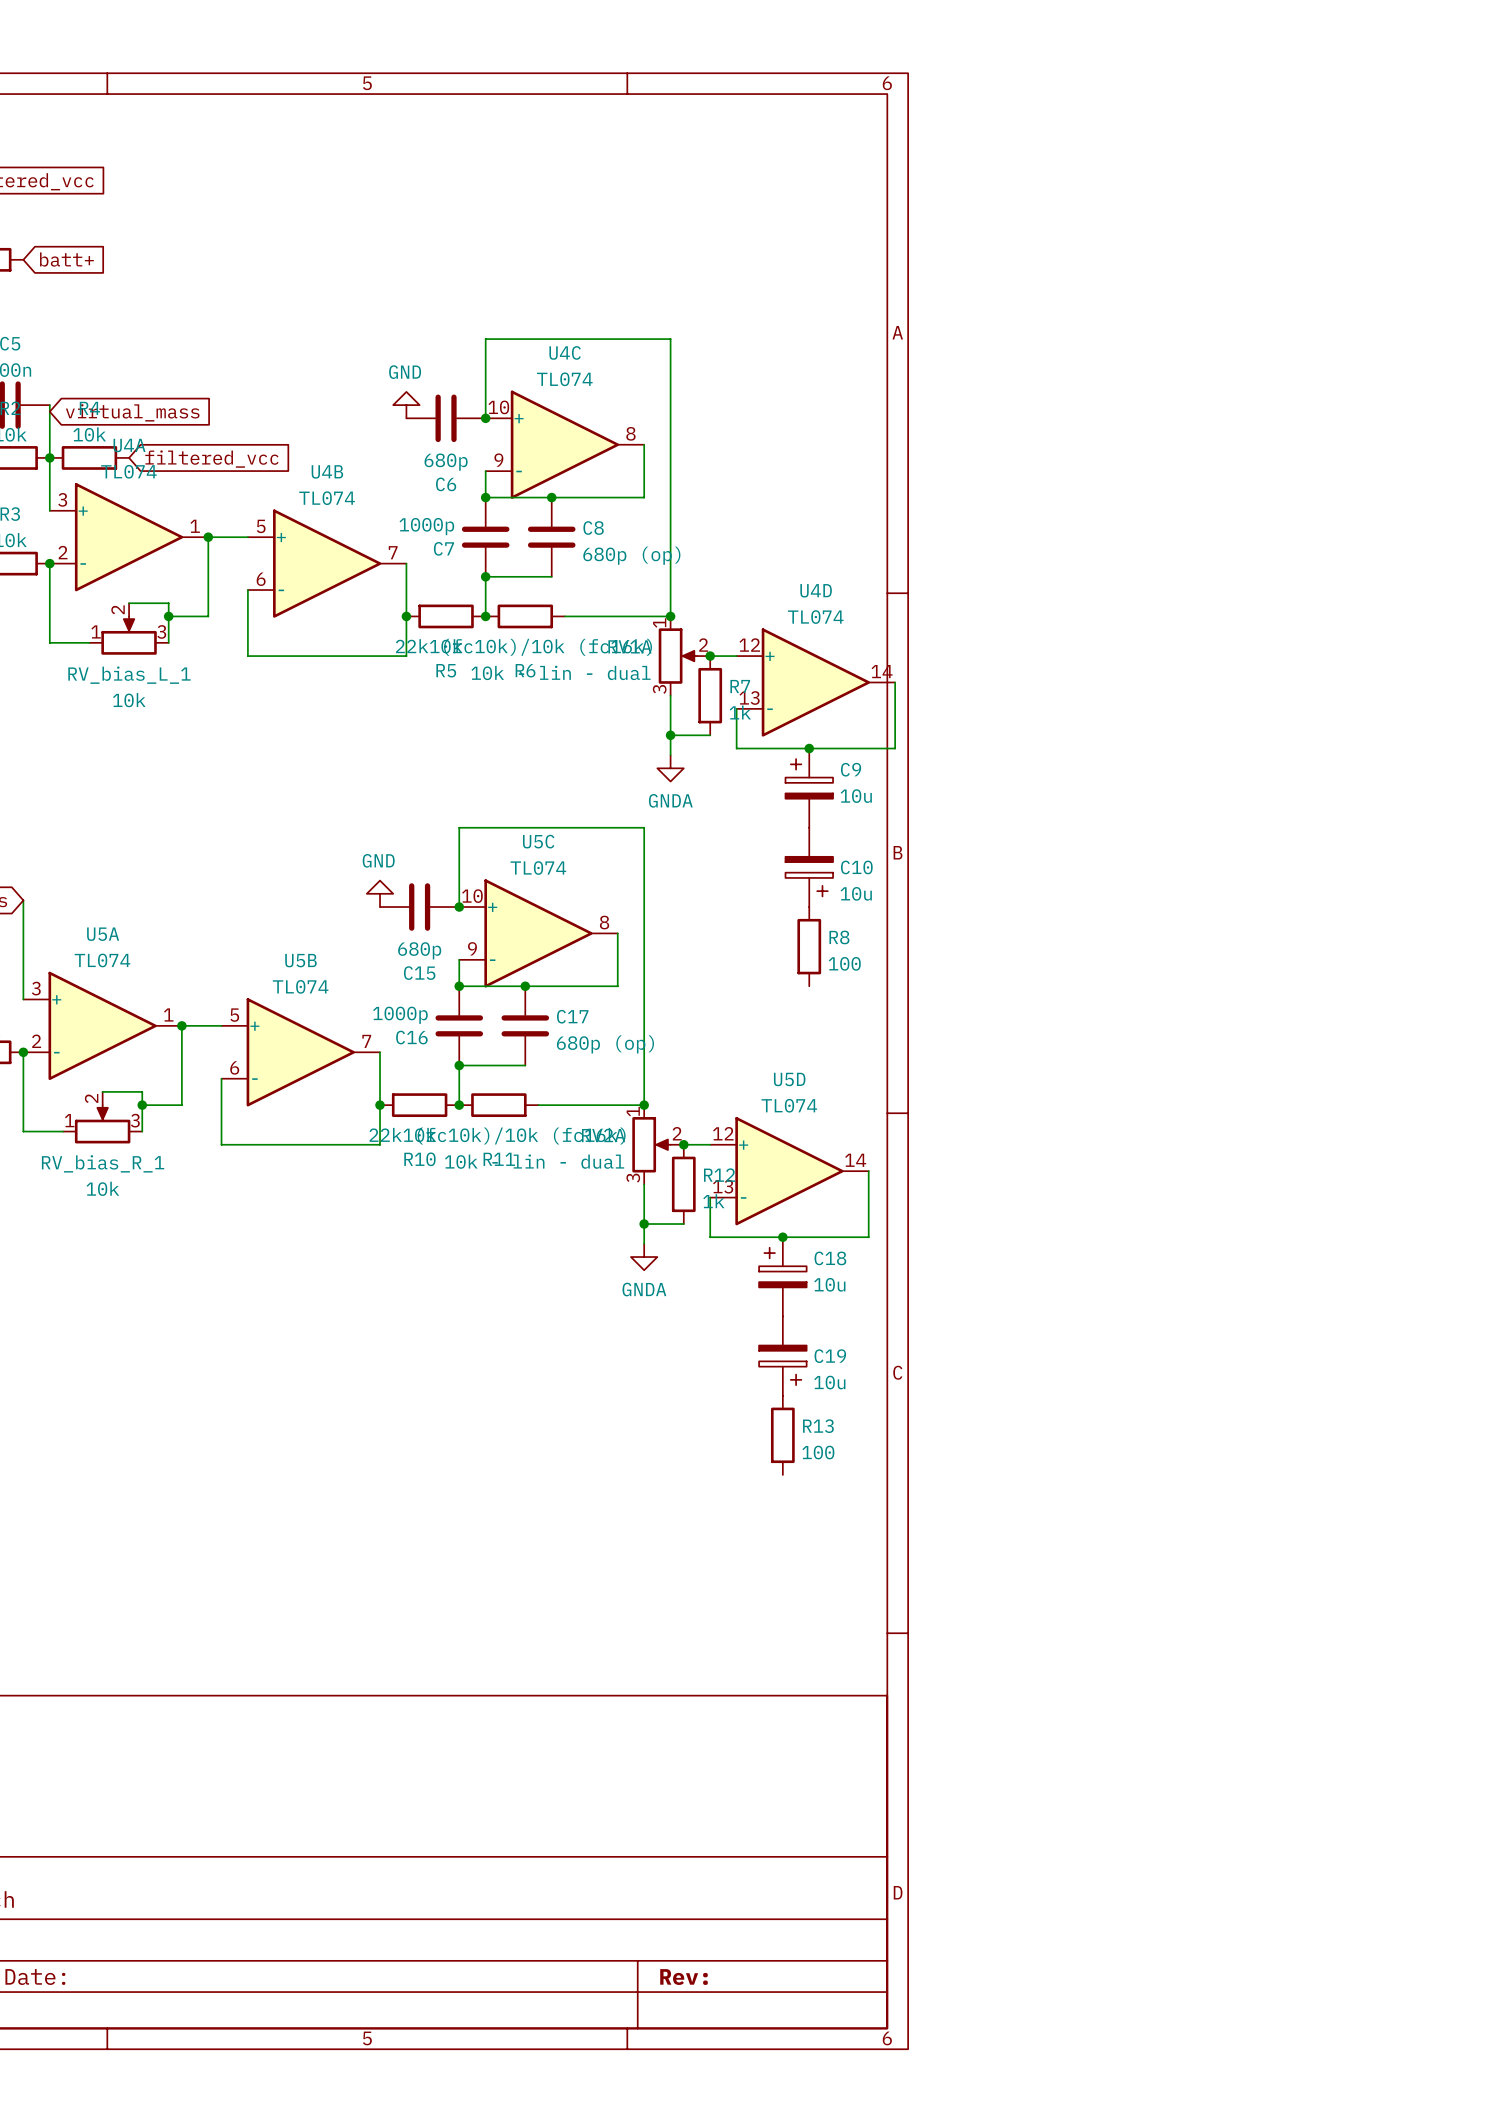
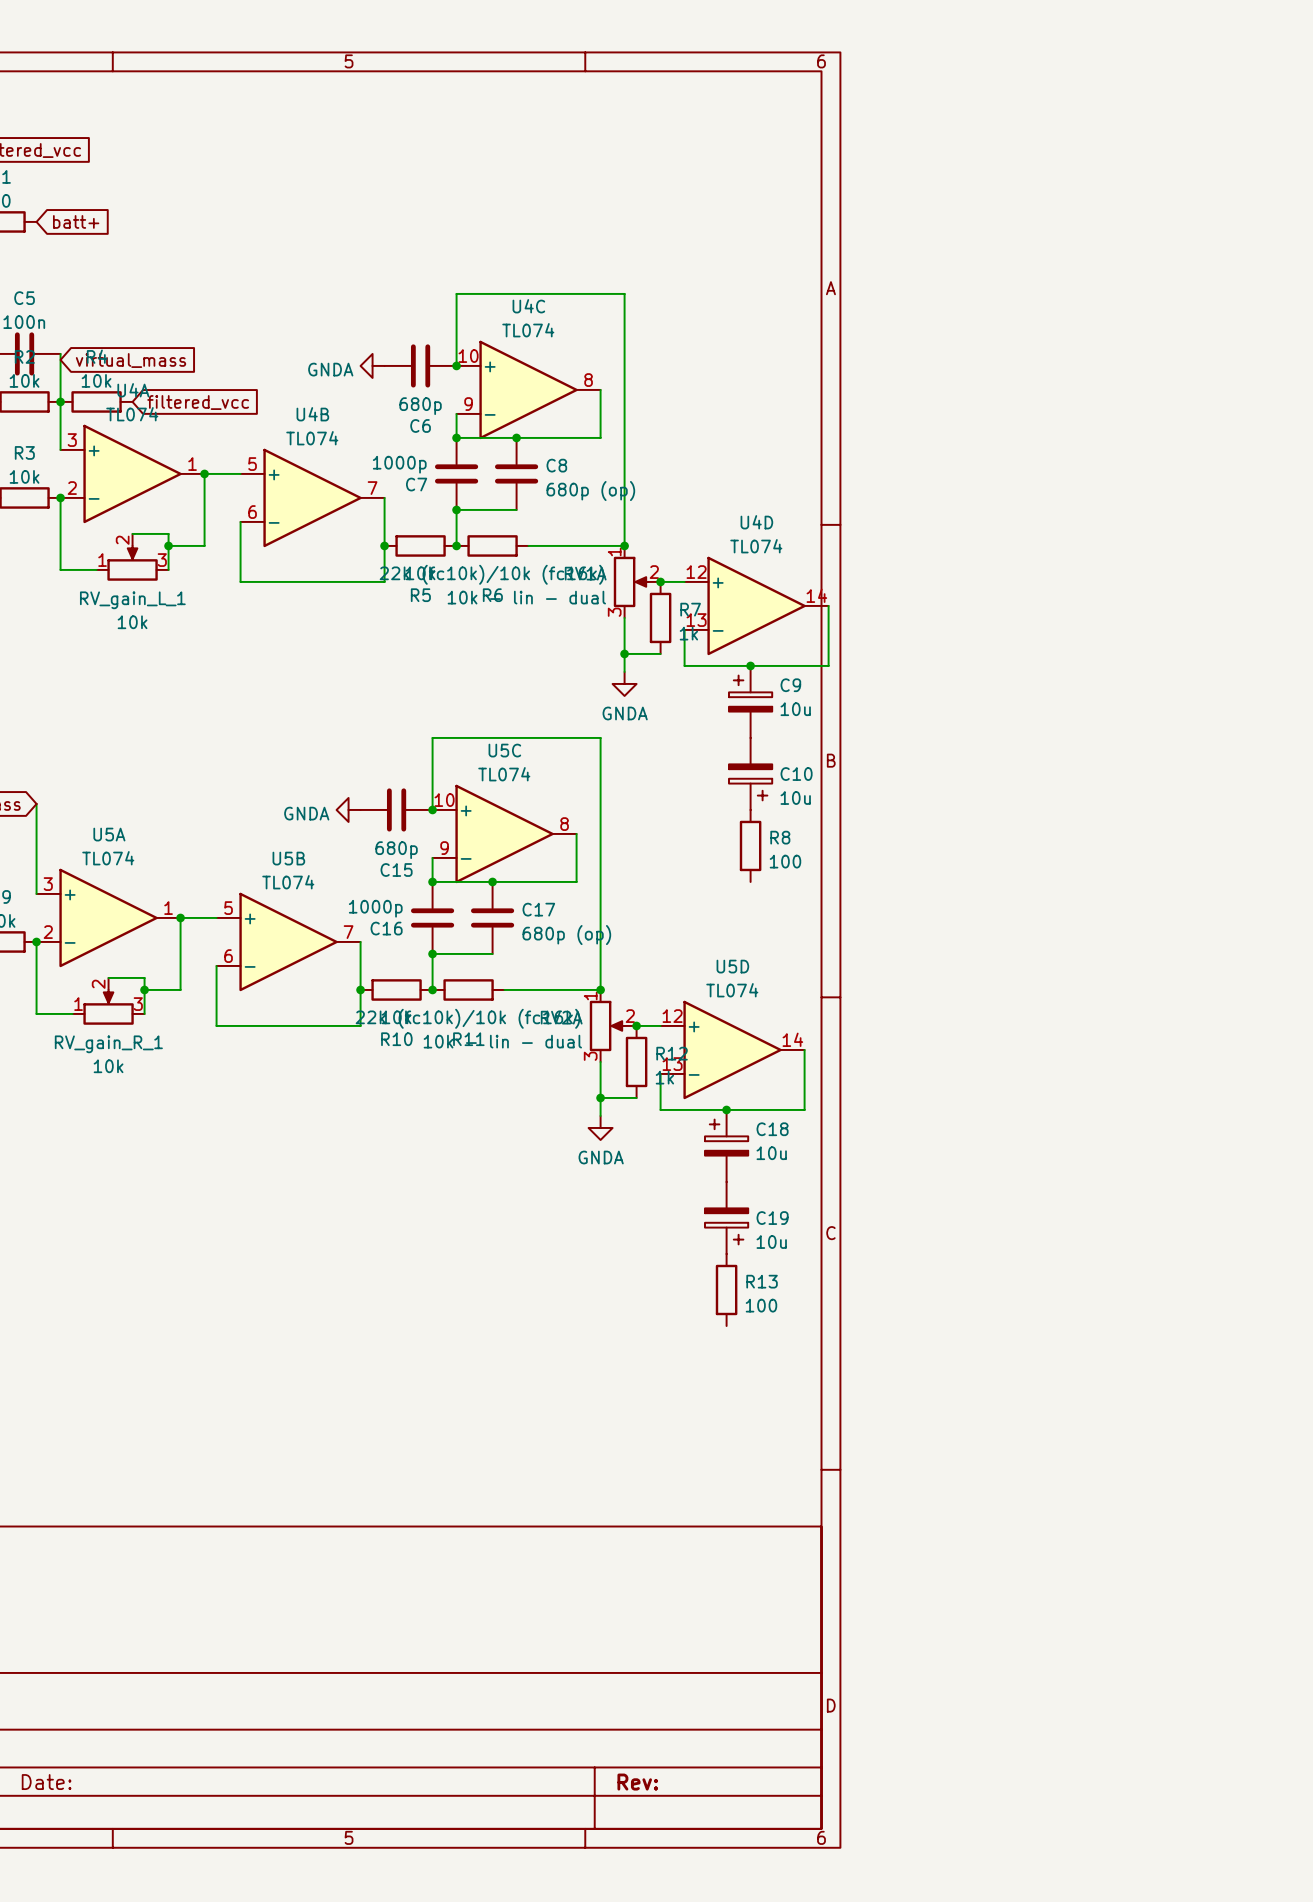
power symbol: GND (406, 405) -> none
power symbol: none -> GNDA (372, 365)
RV_bias_L_1 name: RV_bias_L_1 (129, 675) -> RV_gain_L_1 (132, 600)
power symbol: GND (380, 893) -> none
power symbol: none -> GNDA (348, 809)
RV_bias_R_1 name: RV_bias_R_1 (103, 1163) -> RV_gain_R_1 (108, 1044)

